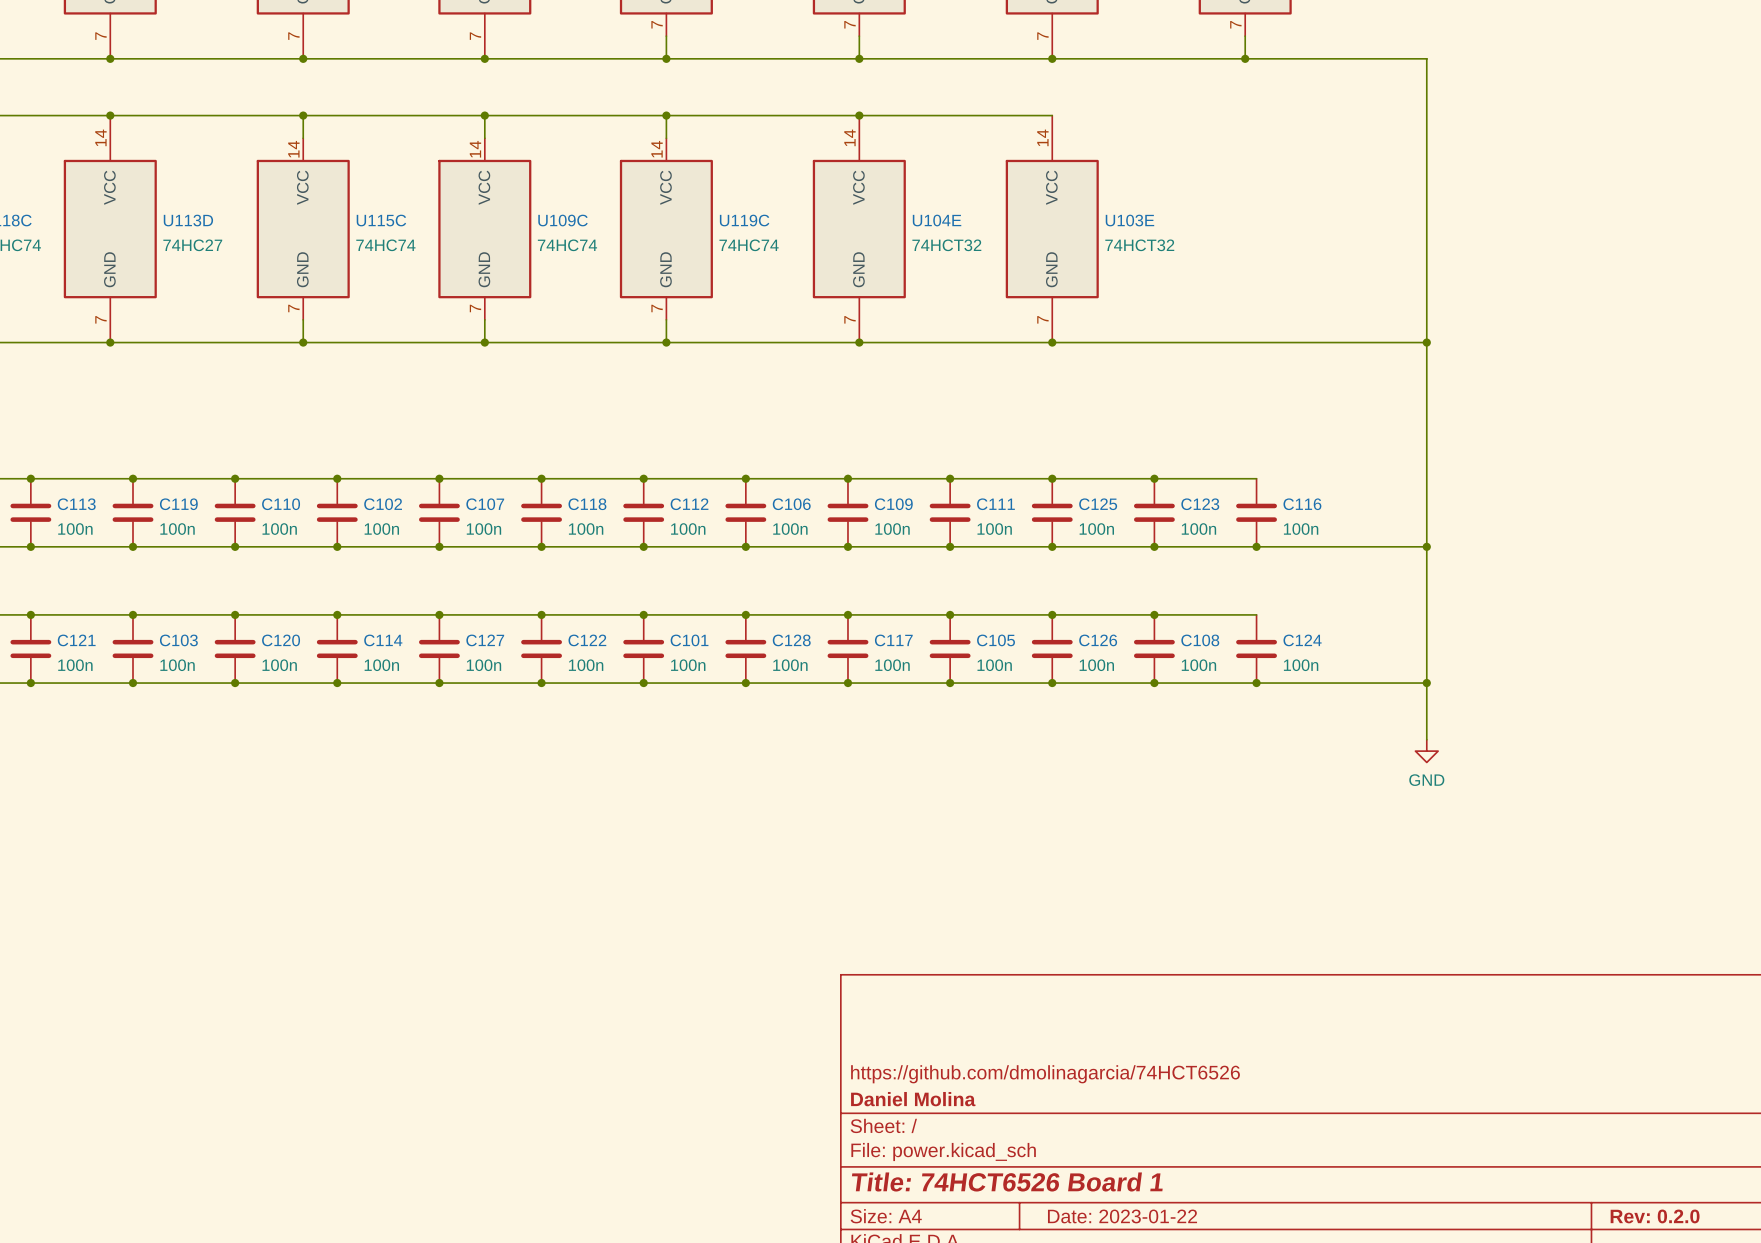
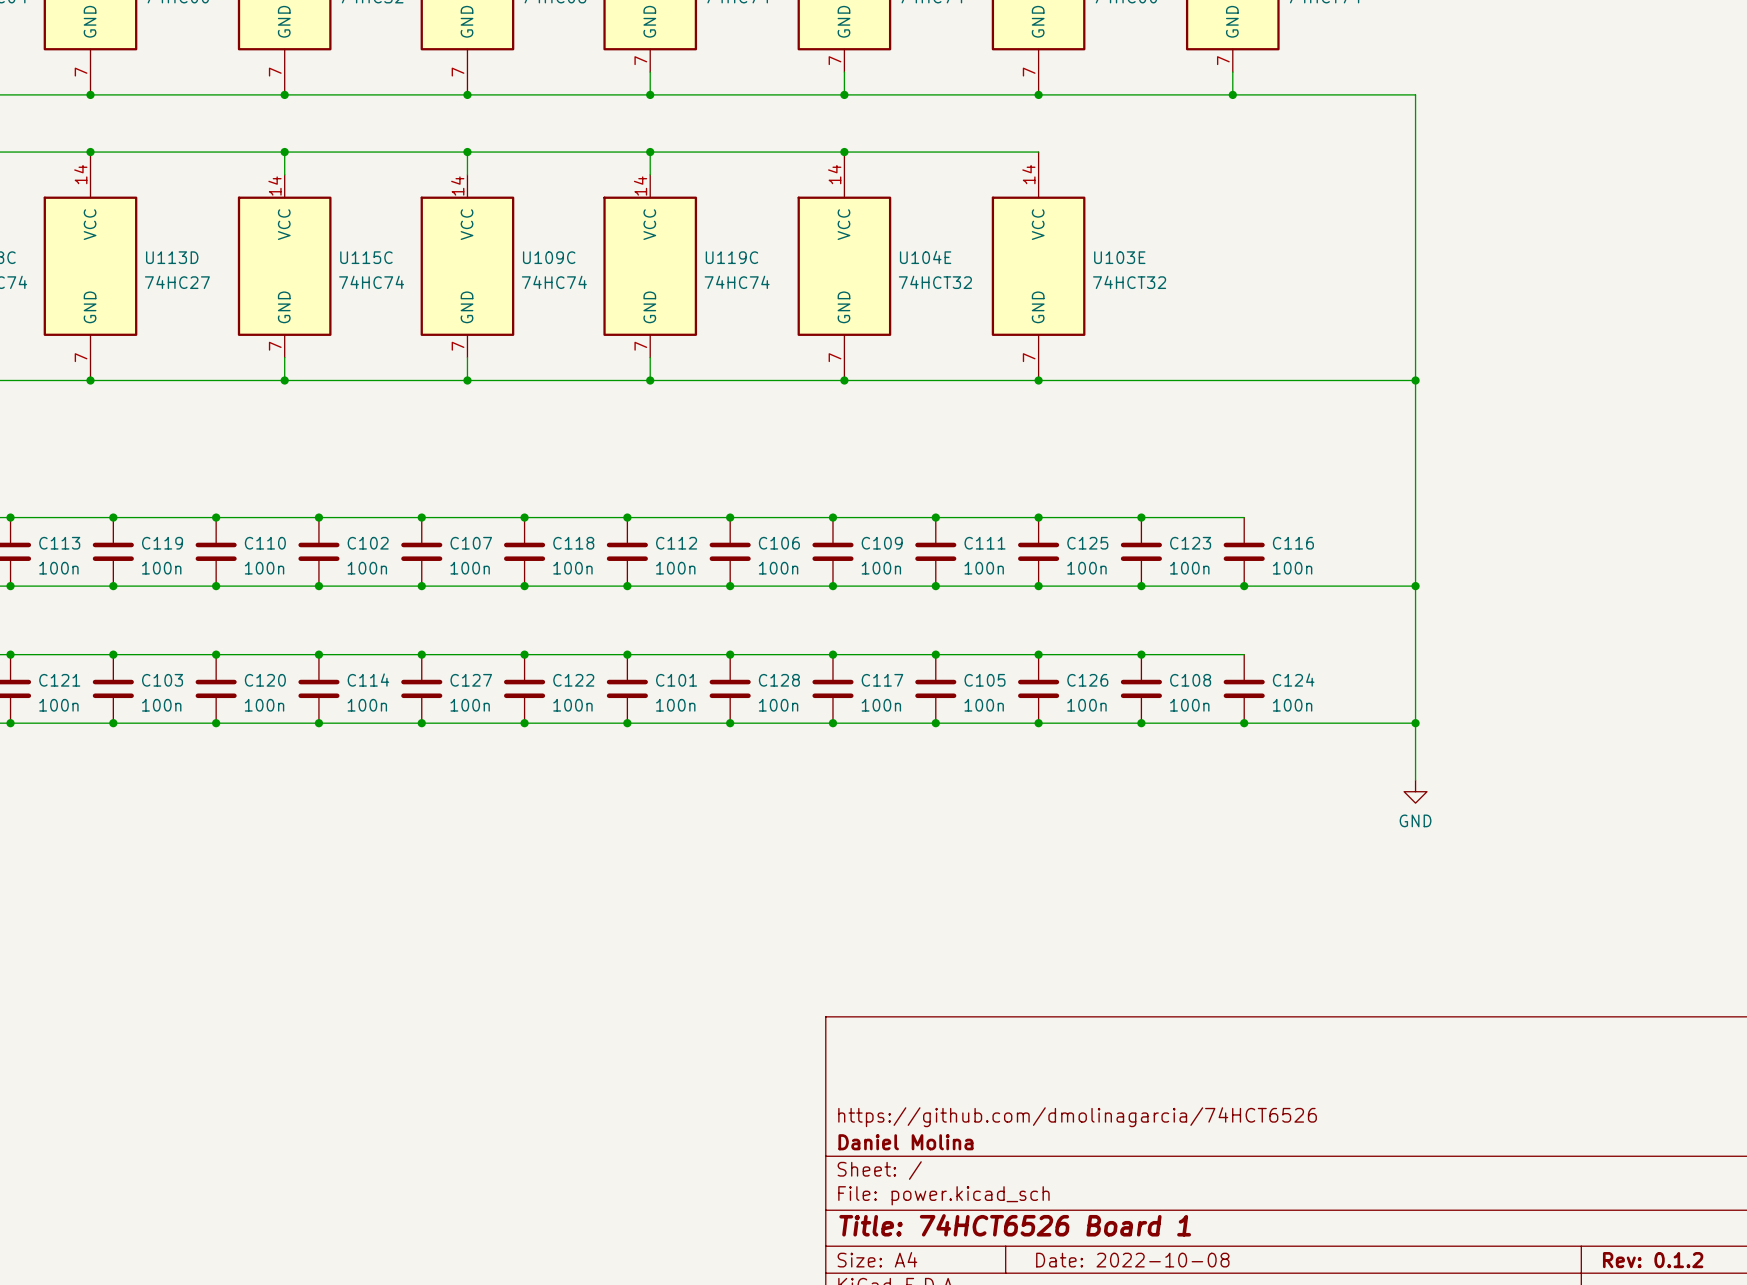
title block: Date: 2023-01-22 (1122, 1216) -> Date: 2022-10-08 (1132, 1260)
title block: Rev: 0.2.0 (1655, 1216) -> Rev: 0.1.2 (1653, 1260)

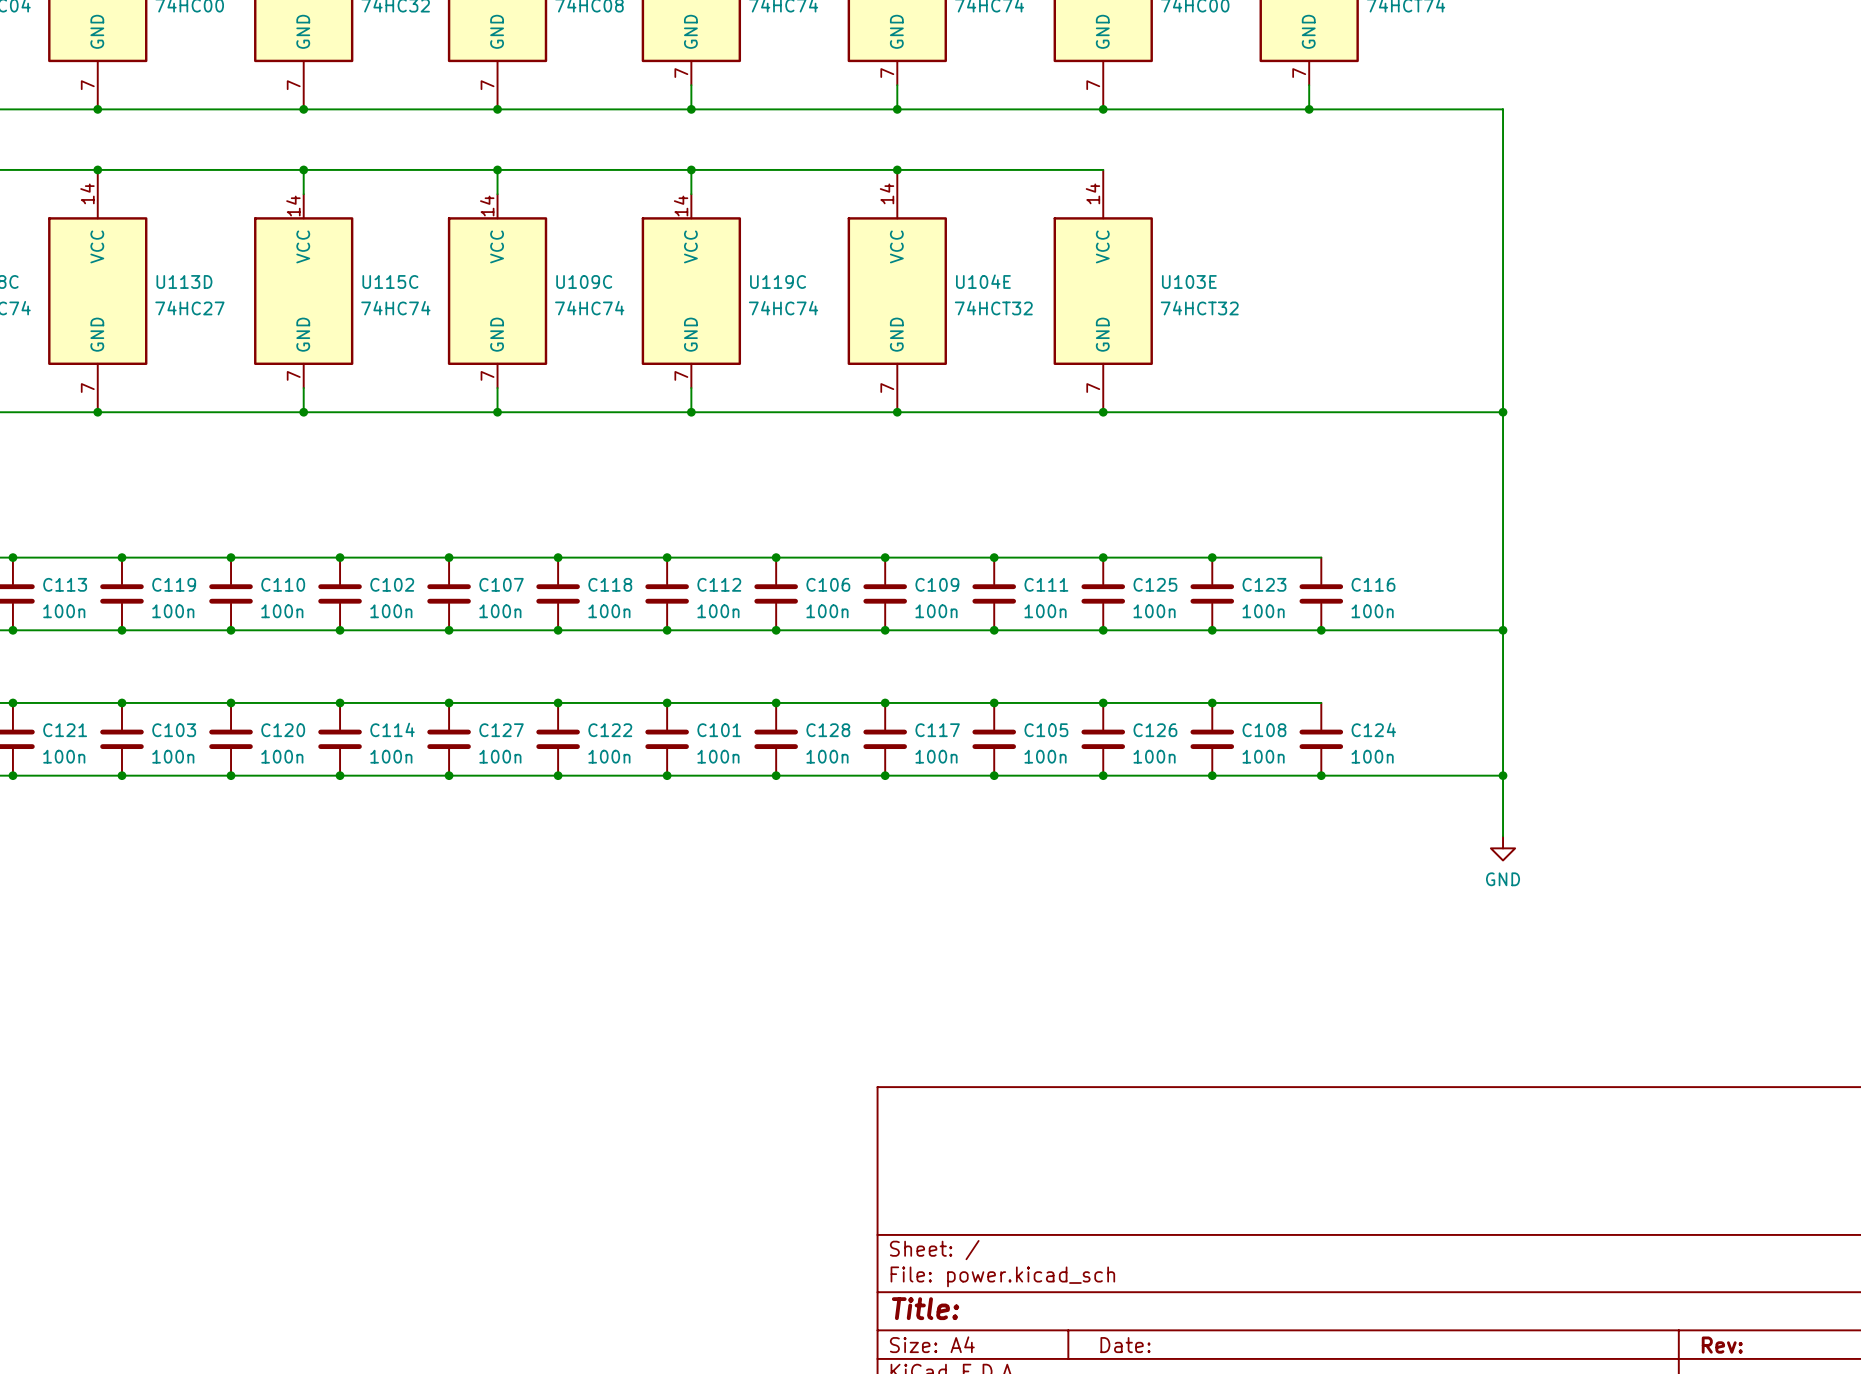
title block: https://github.com/dmolinagarcia/74HCT6526 (1077, 1117) -> none
title block: Daniel Molina (905, 1142) -> none
title block: Title: 74HCT6526 Board 1 (1015, 1225) -> Title: (925, 1308)
title block: Date: 2022-10-08 (1132, 1260) -> Date: (1125, 1345)
title block: Rev: 0.1.2 (1653, 1260) -> Rev: (1722, 1345)

